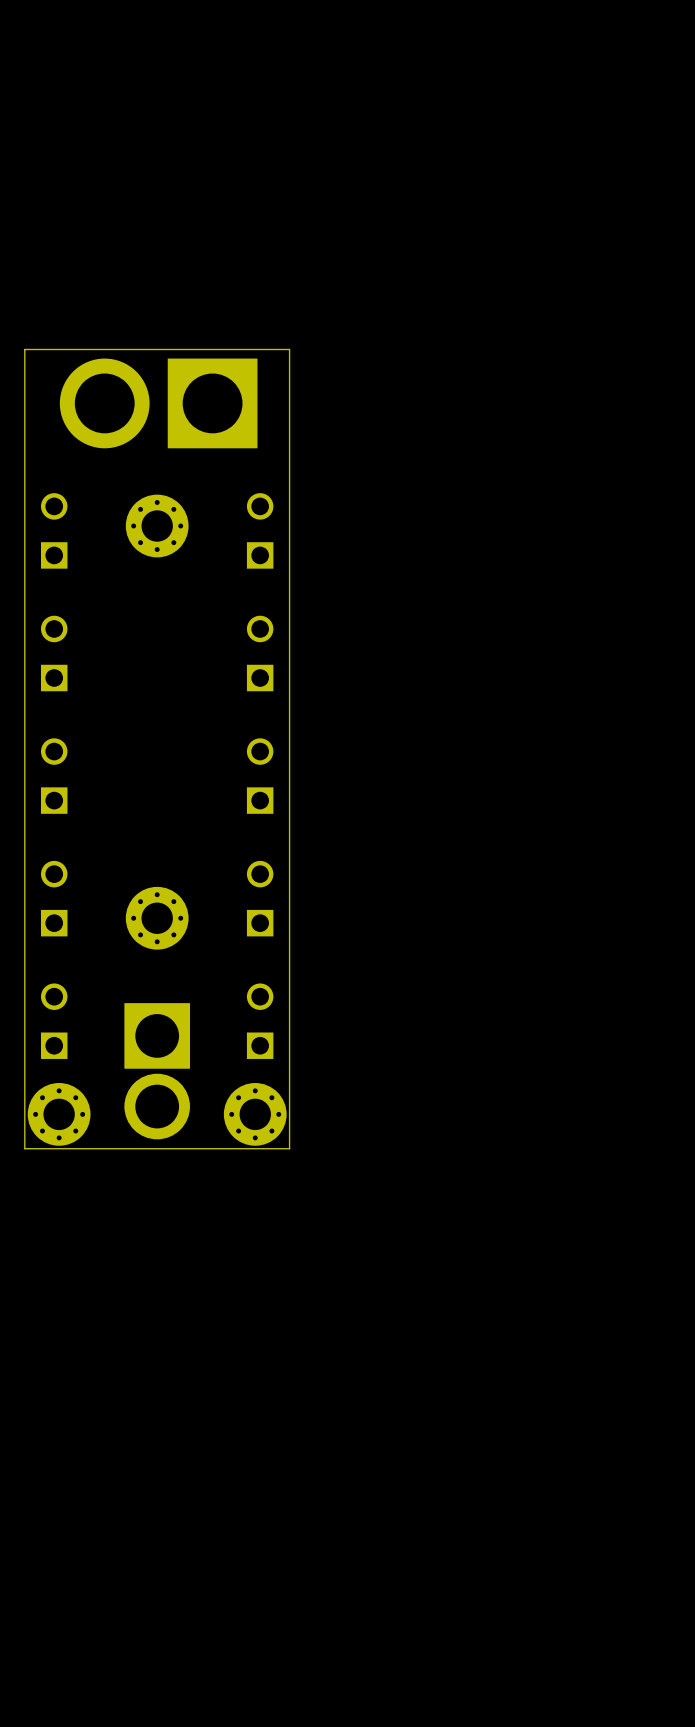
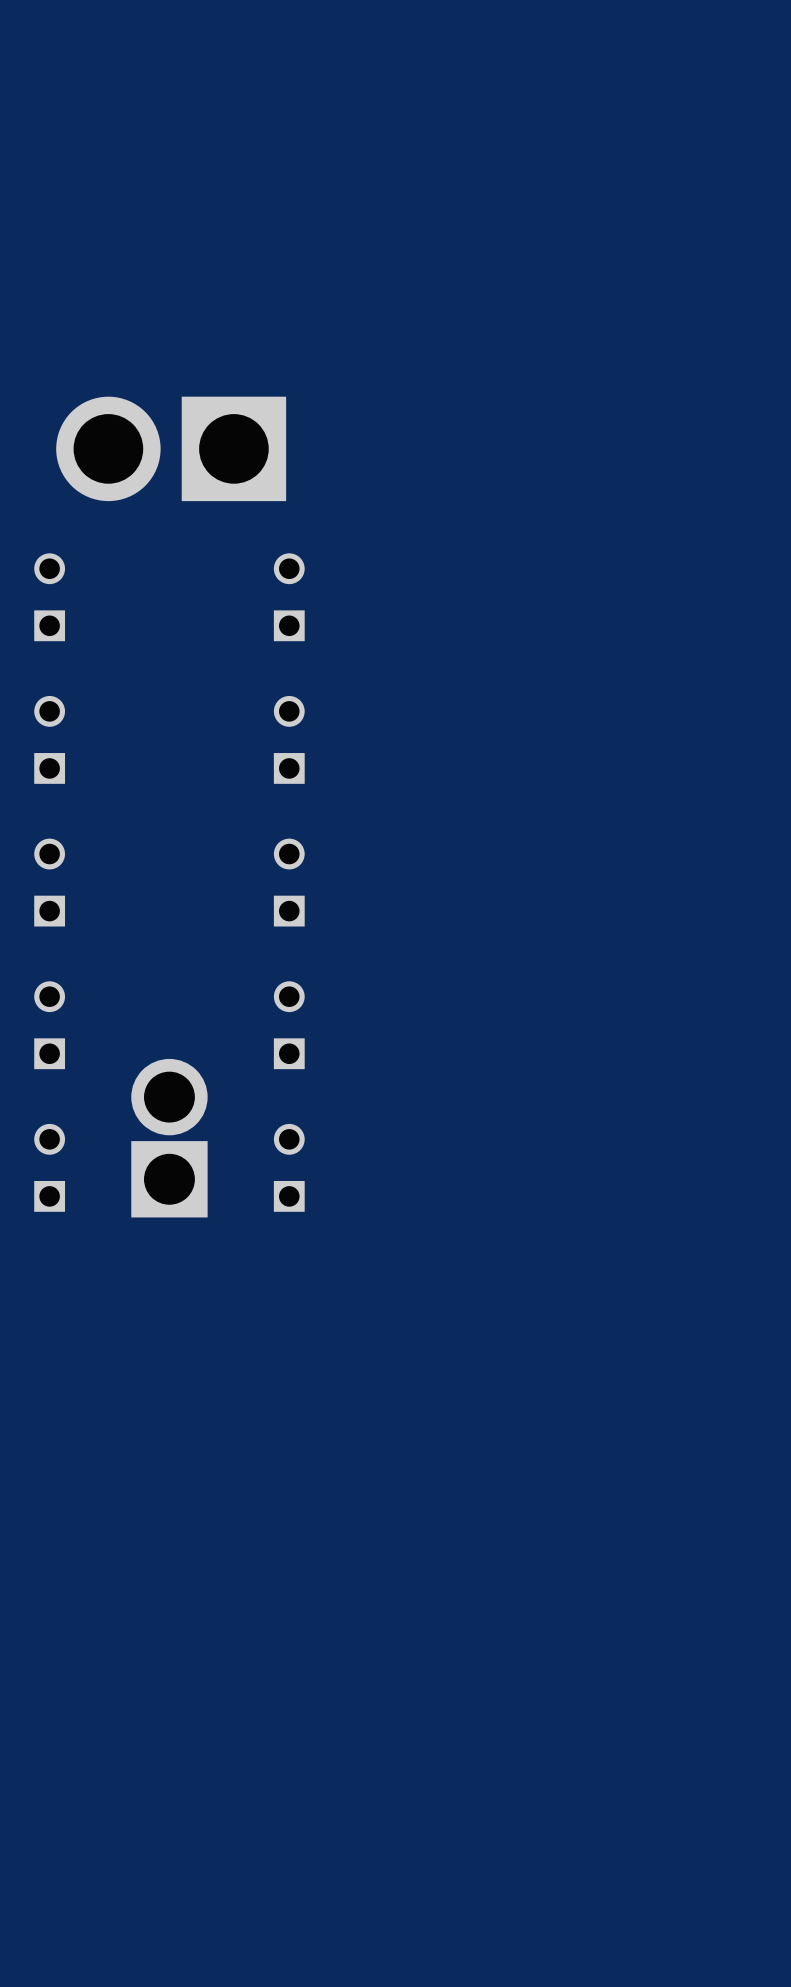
board edge: (289, 349) (24, 349) (24, 1148) (289, 1148) (289, 349) -> none
part: (157, 526) -> none
part: (157, 918) -> none
part rotation: 0° (157, 1071) -> 180° (169, 1138)
part: (59, 1114) -> none
part: (255, 1114) -> none

